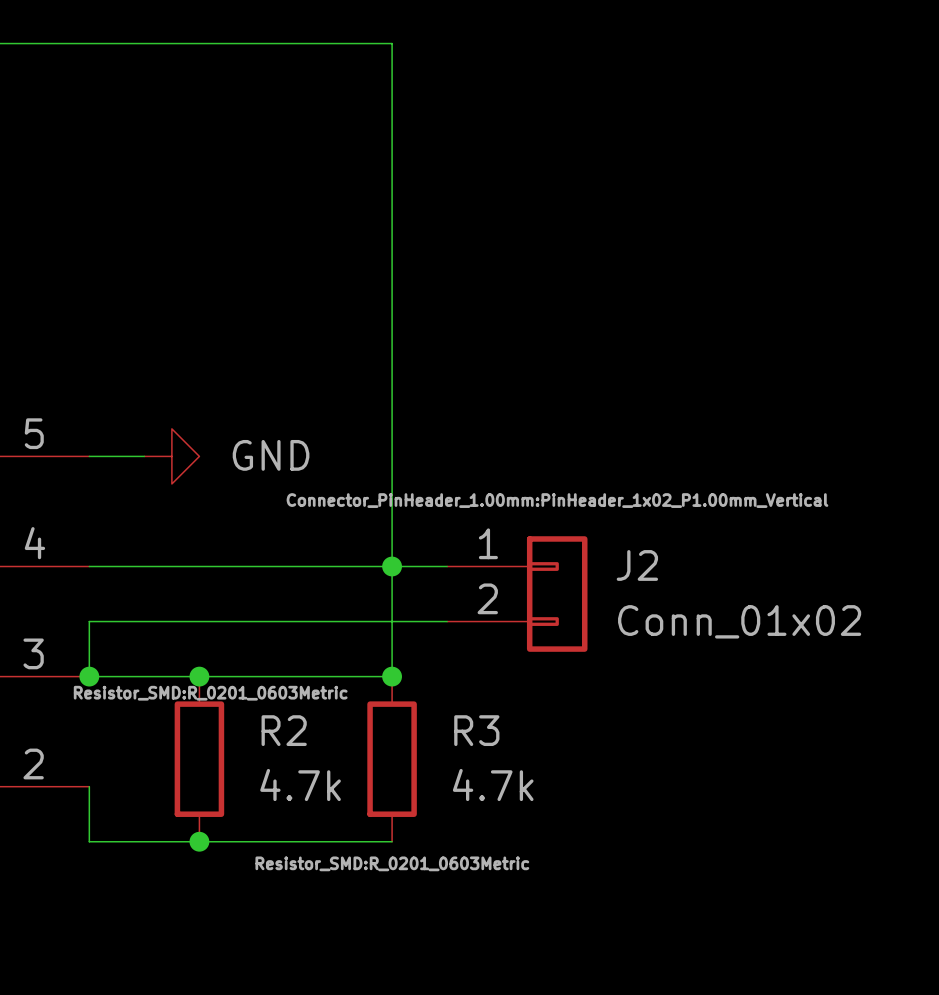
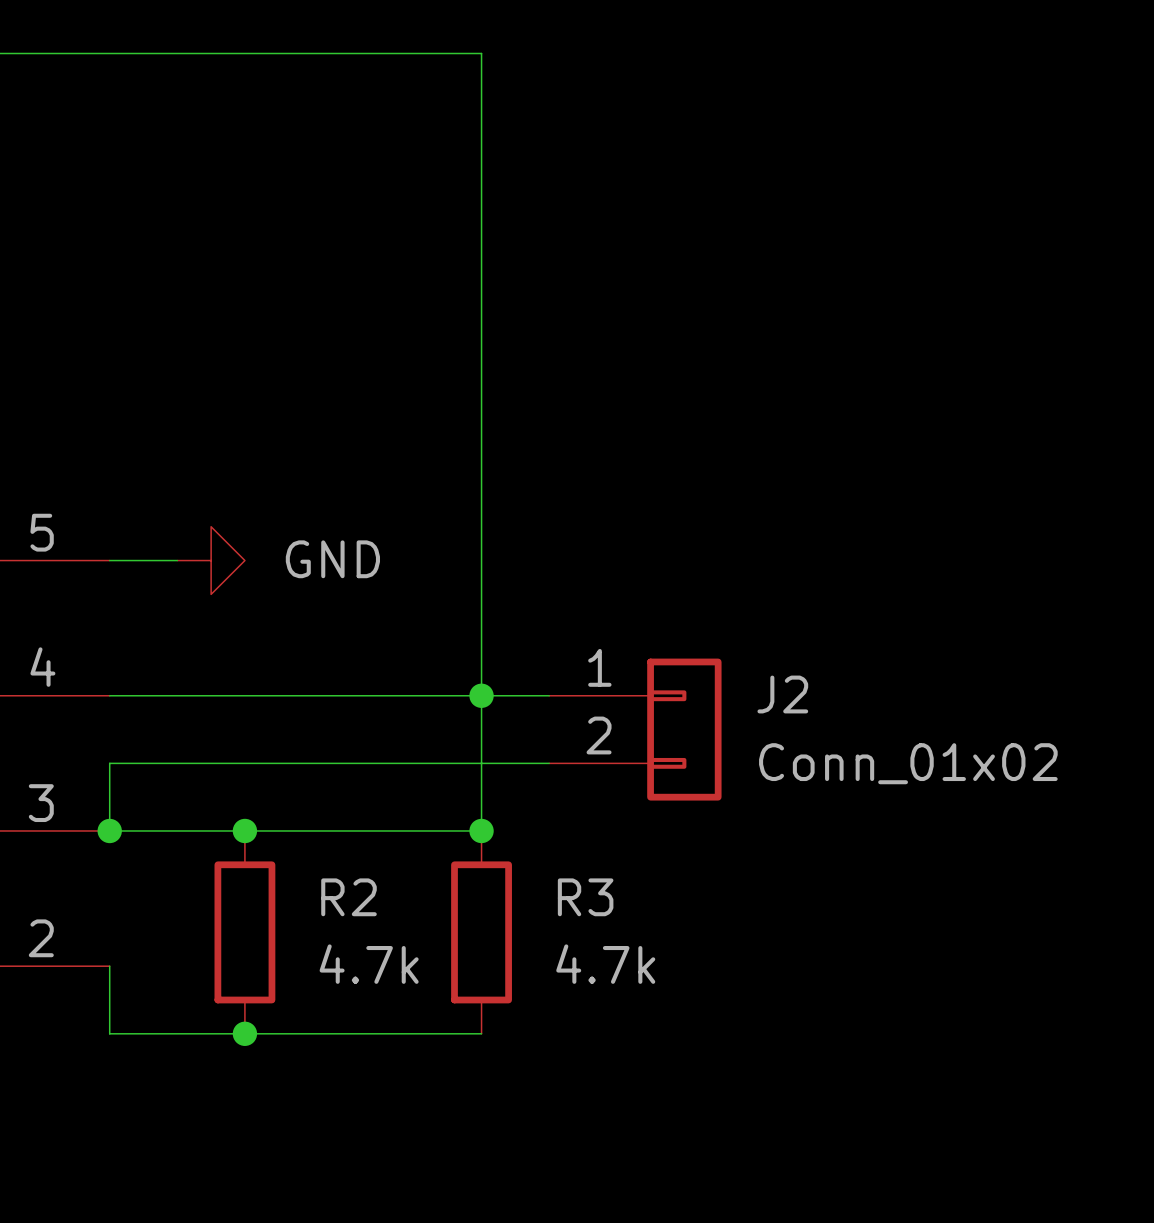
J2 text: Connector_PinHeader_1.00mm:PinHeader_1x02_P1.00mm_Vertical (557, 500) -> none
R2 text: Resistor_SMD:R_0201_0603Metric (210, 693) -> none
R3 text: Resistor_SMD:R_0201_0603Metric (392, 863) -> none

